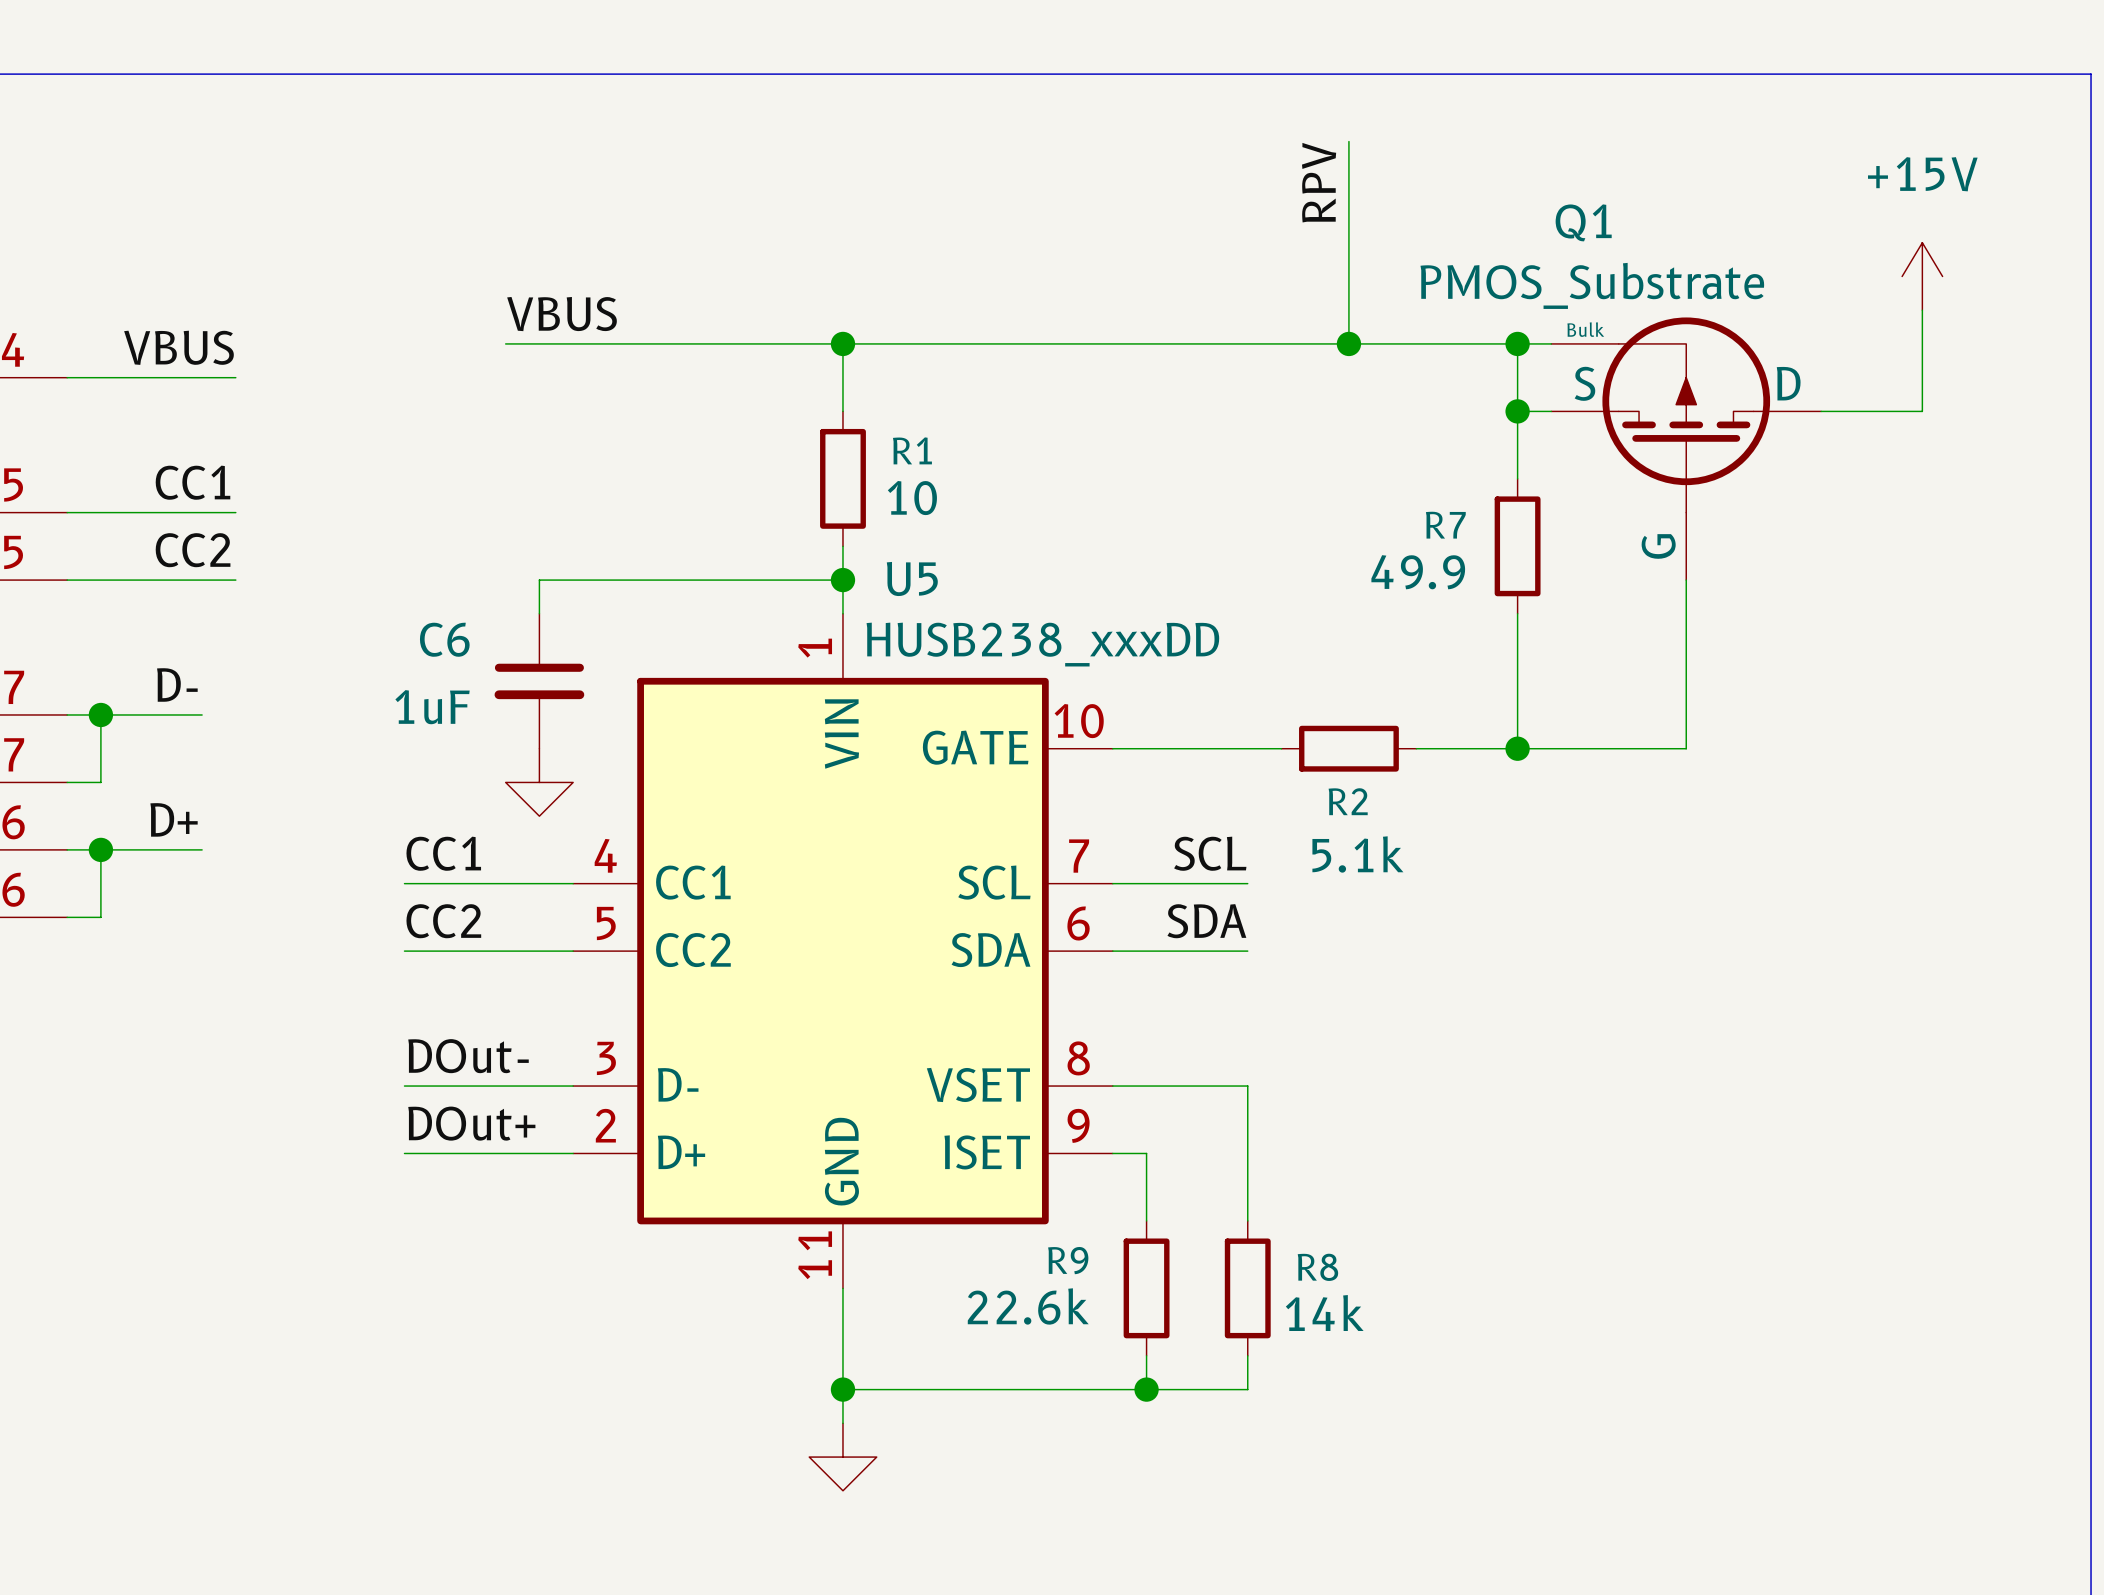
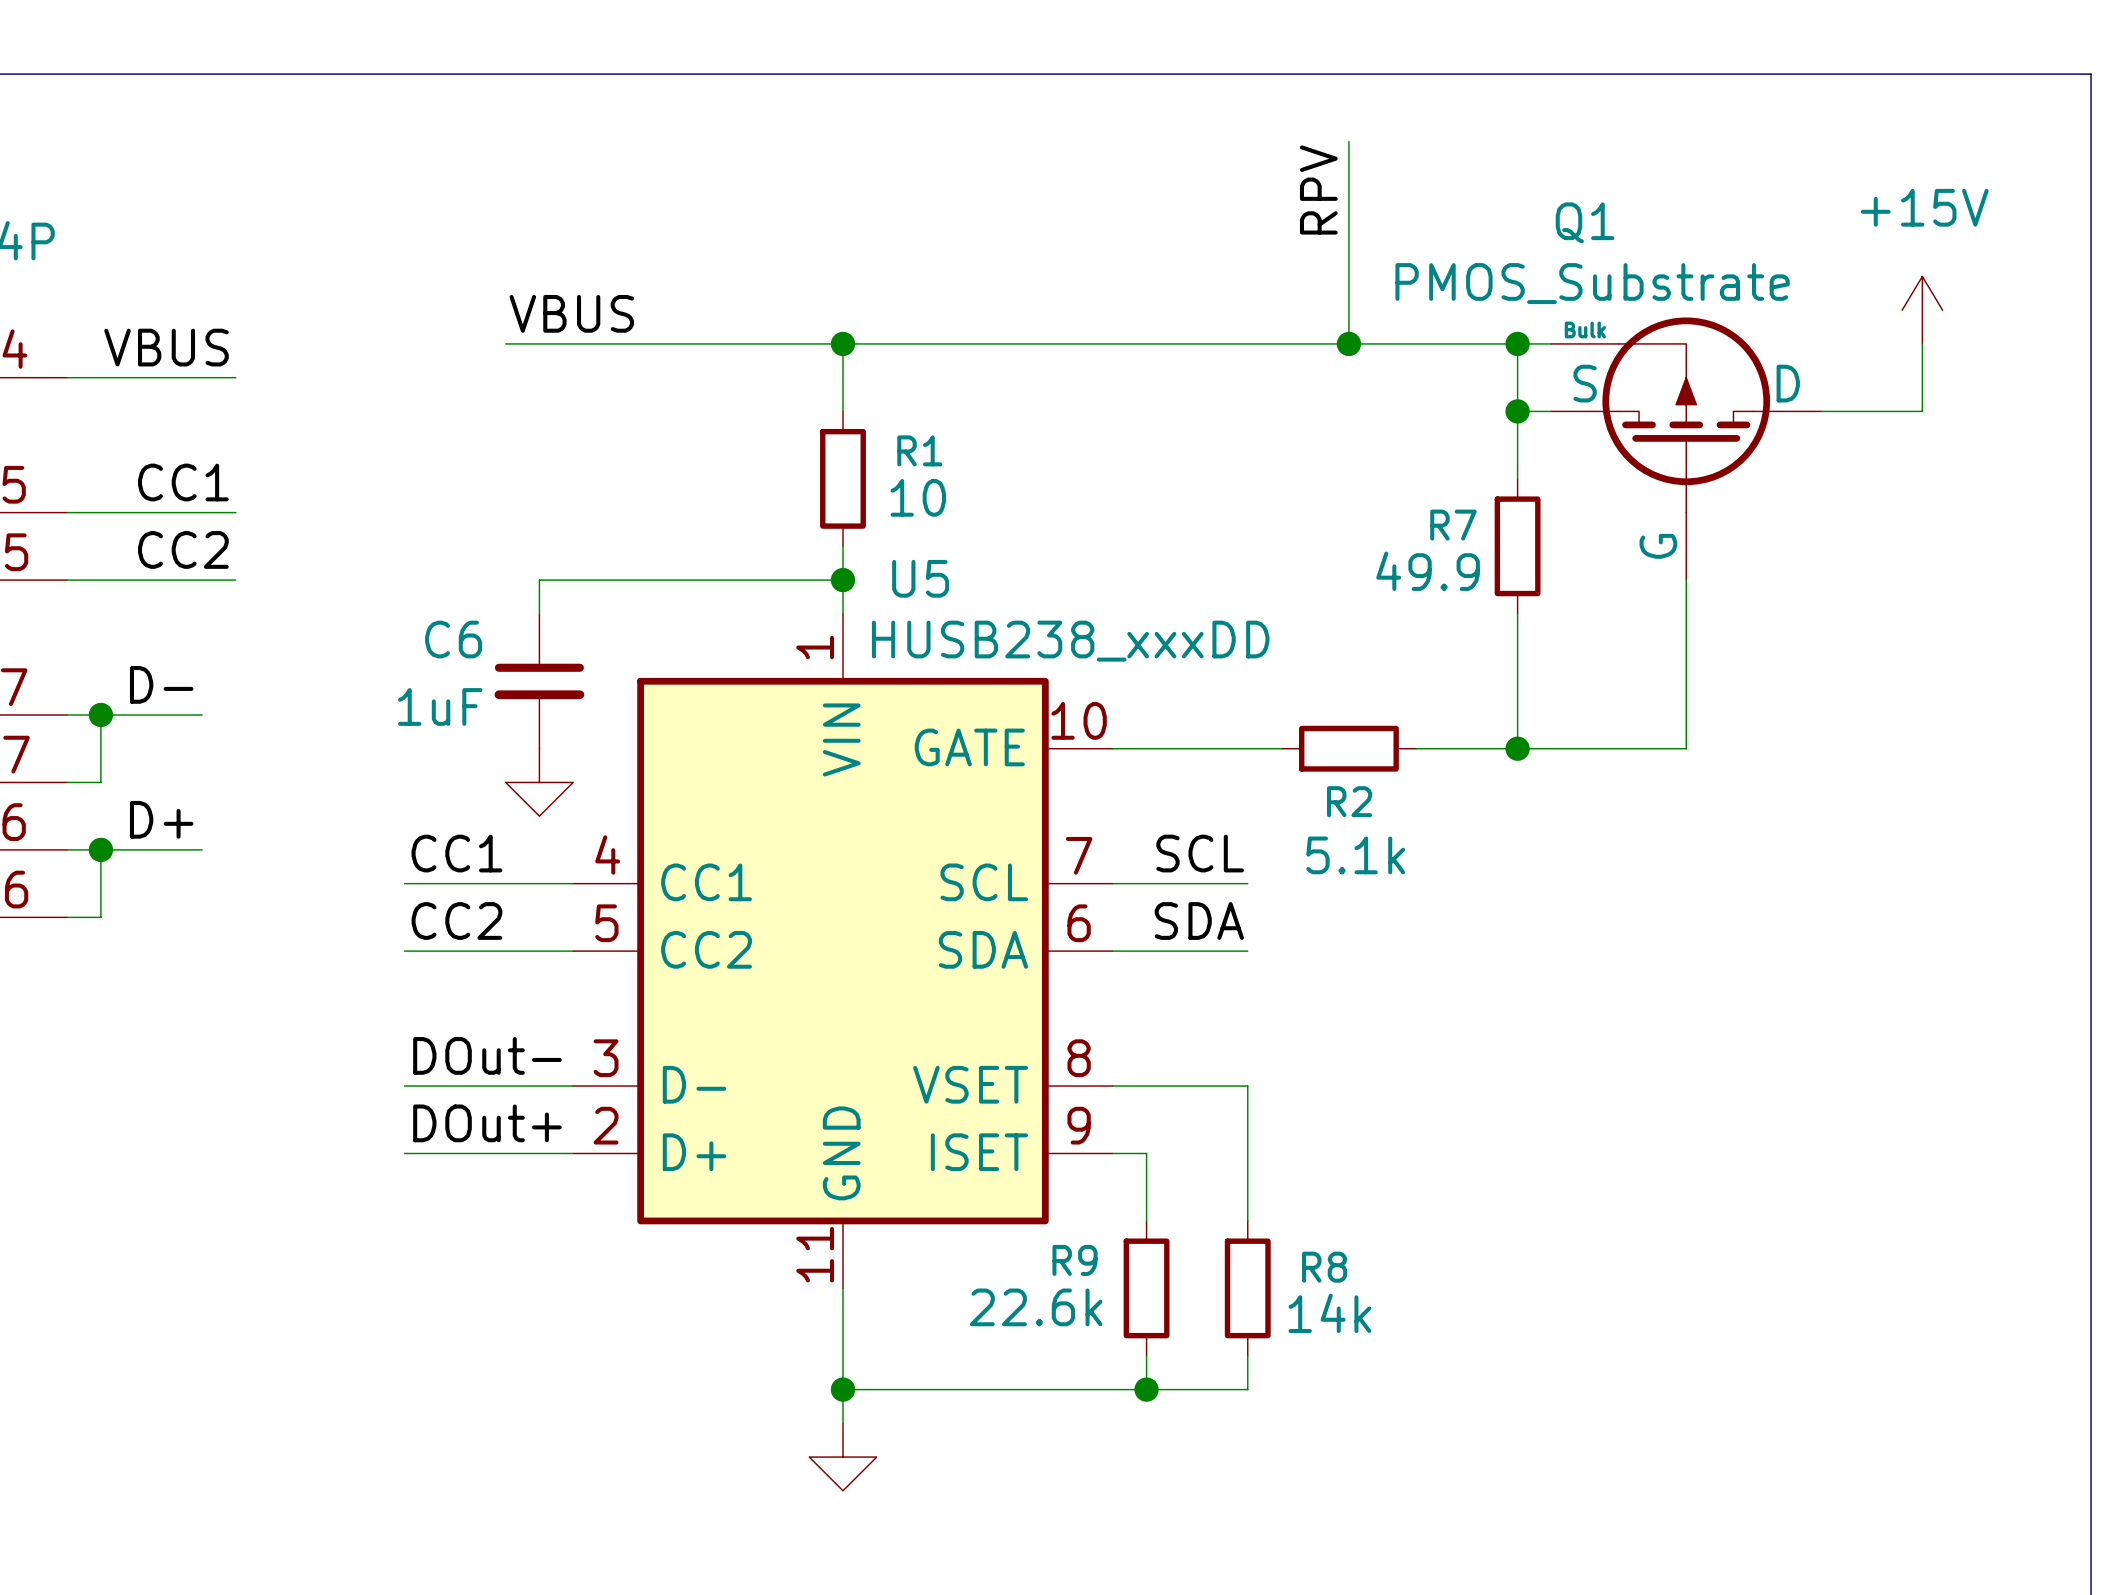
power symbol position: +15V (1922, 276) -> +15V (1922, 310)

